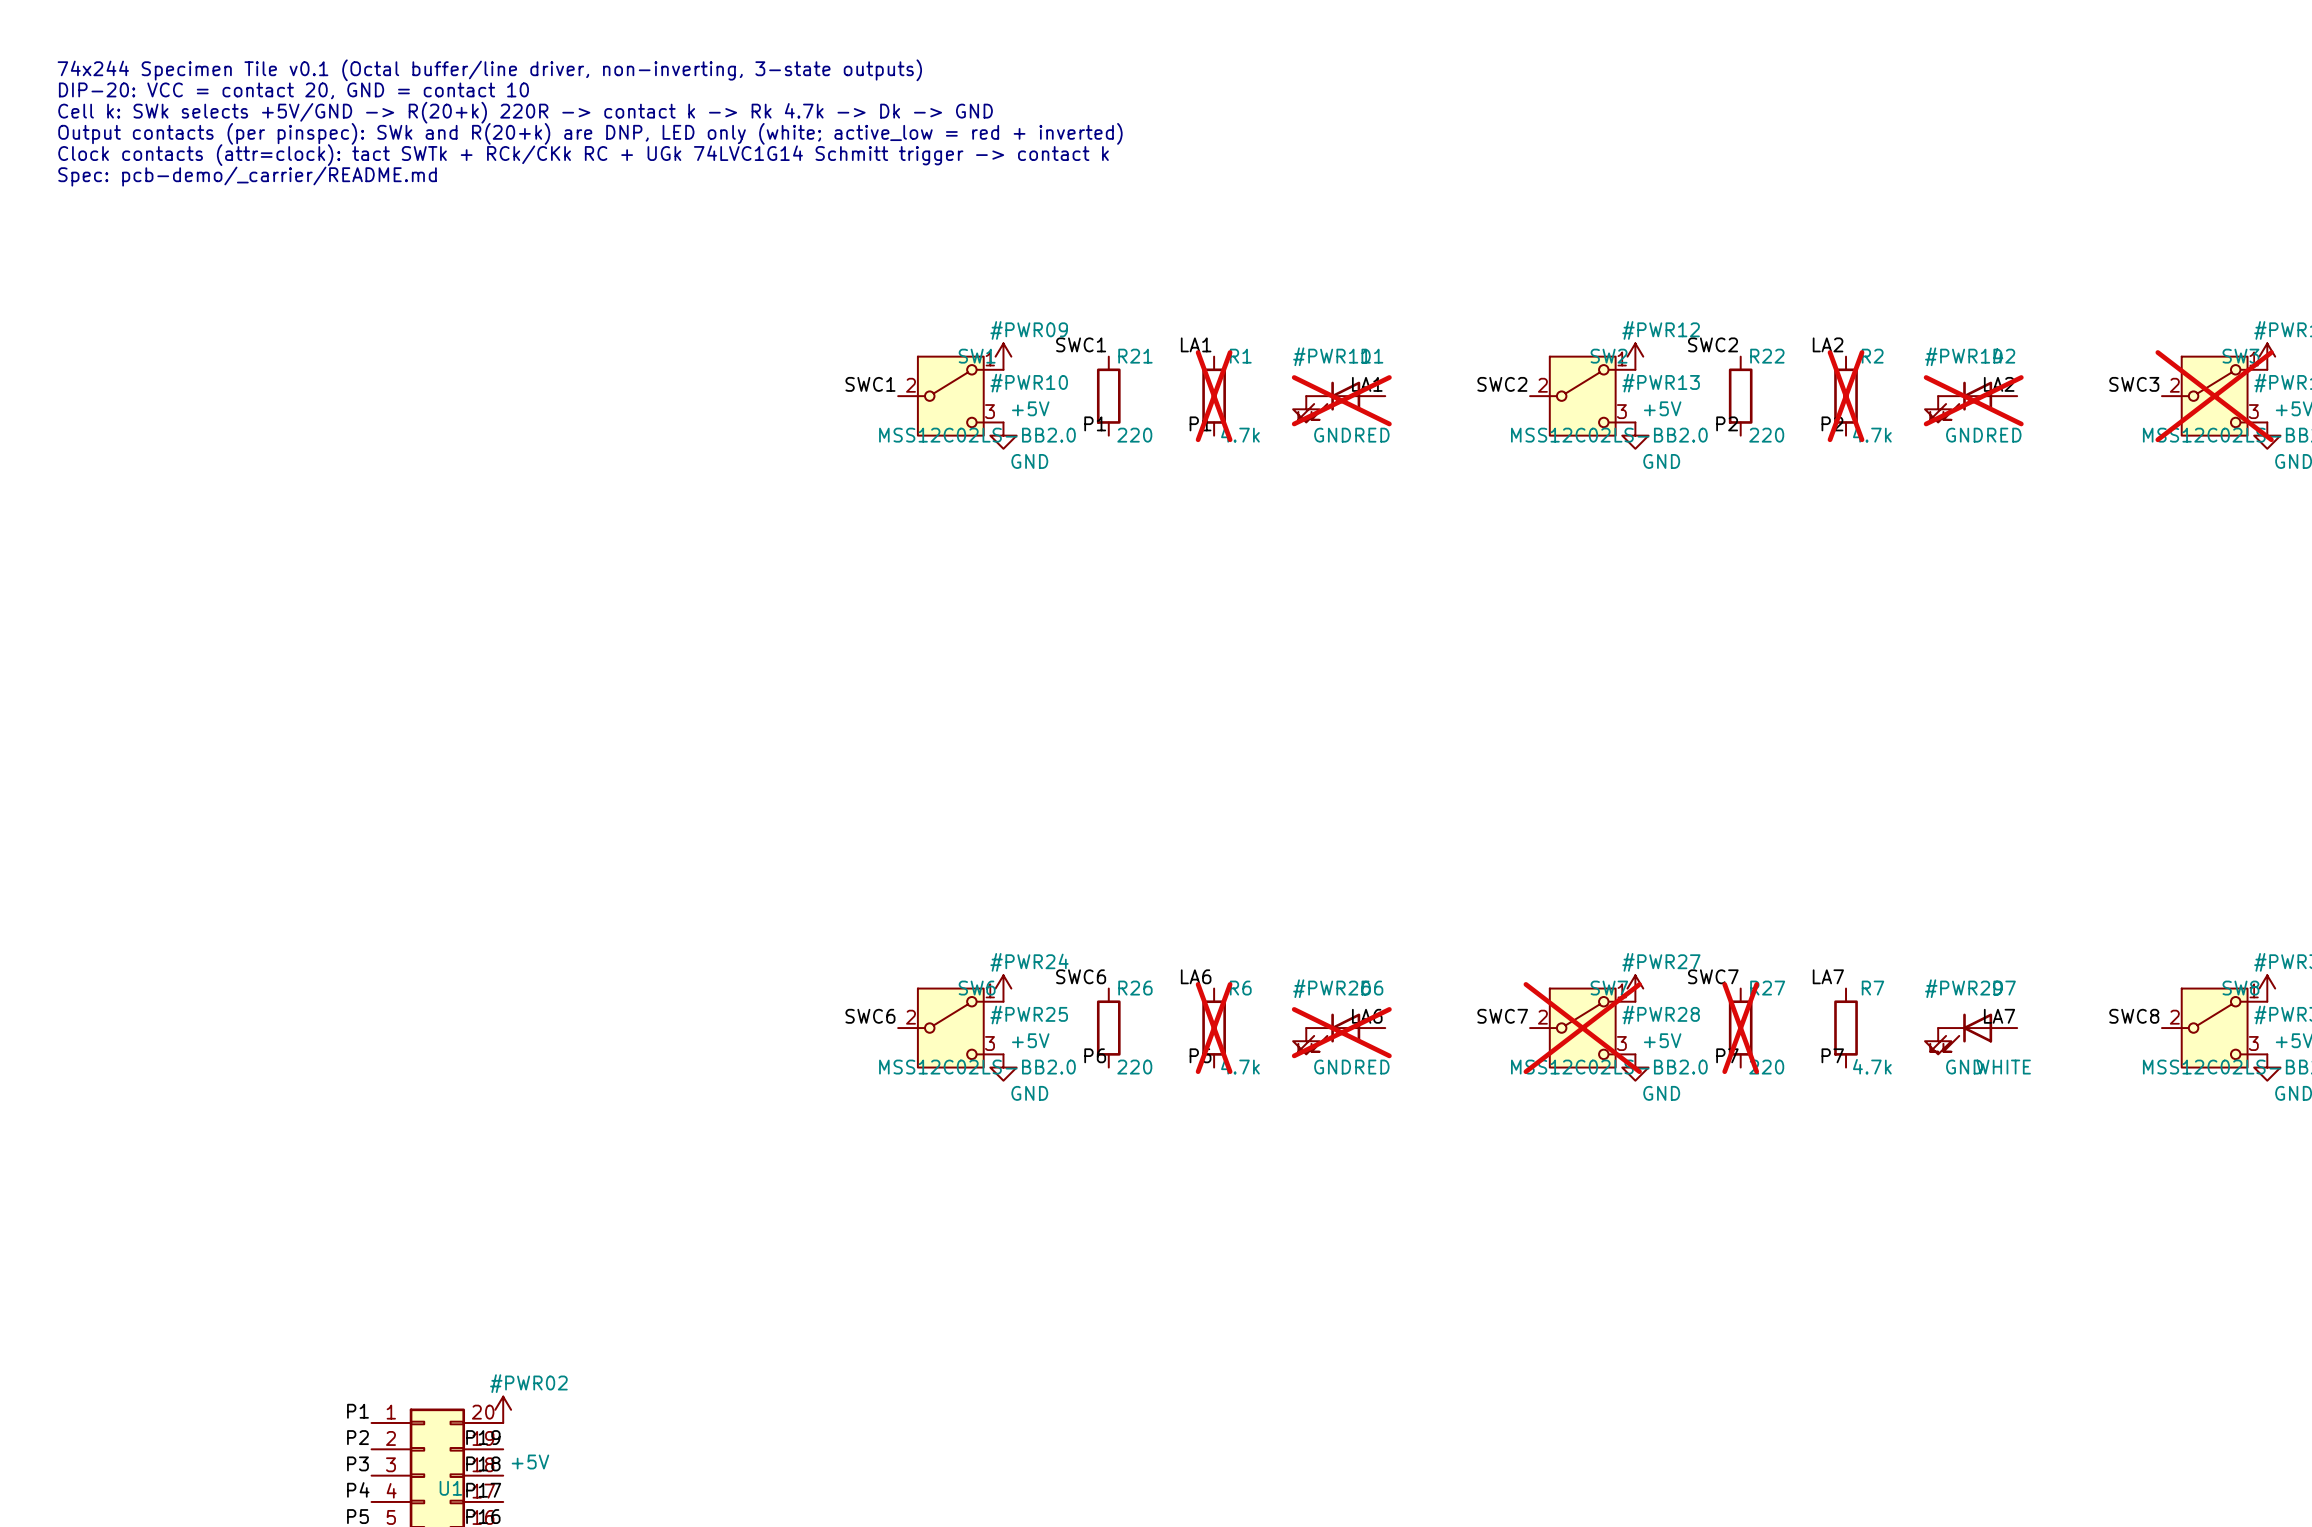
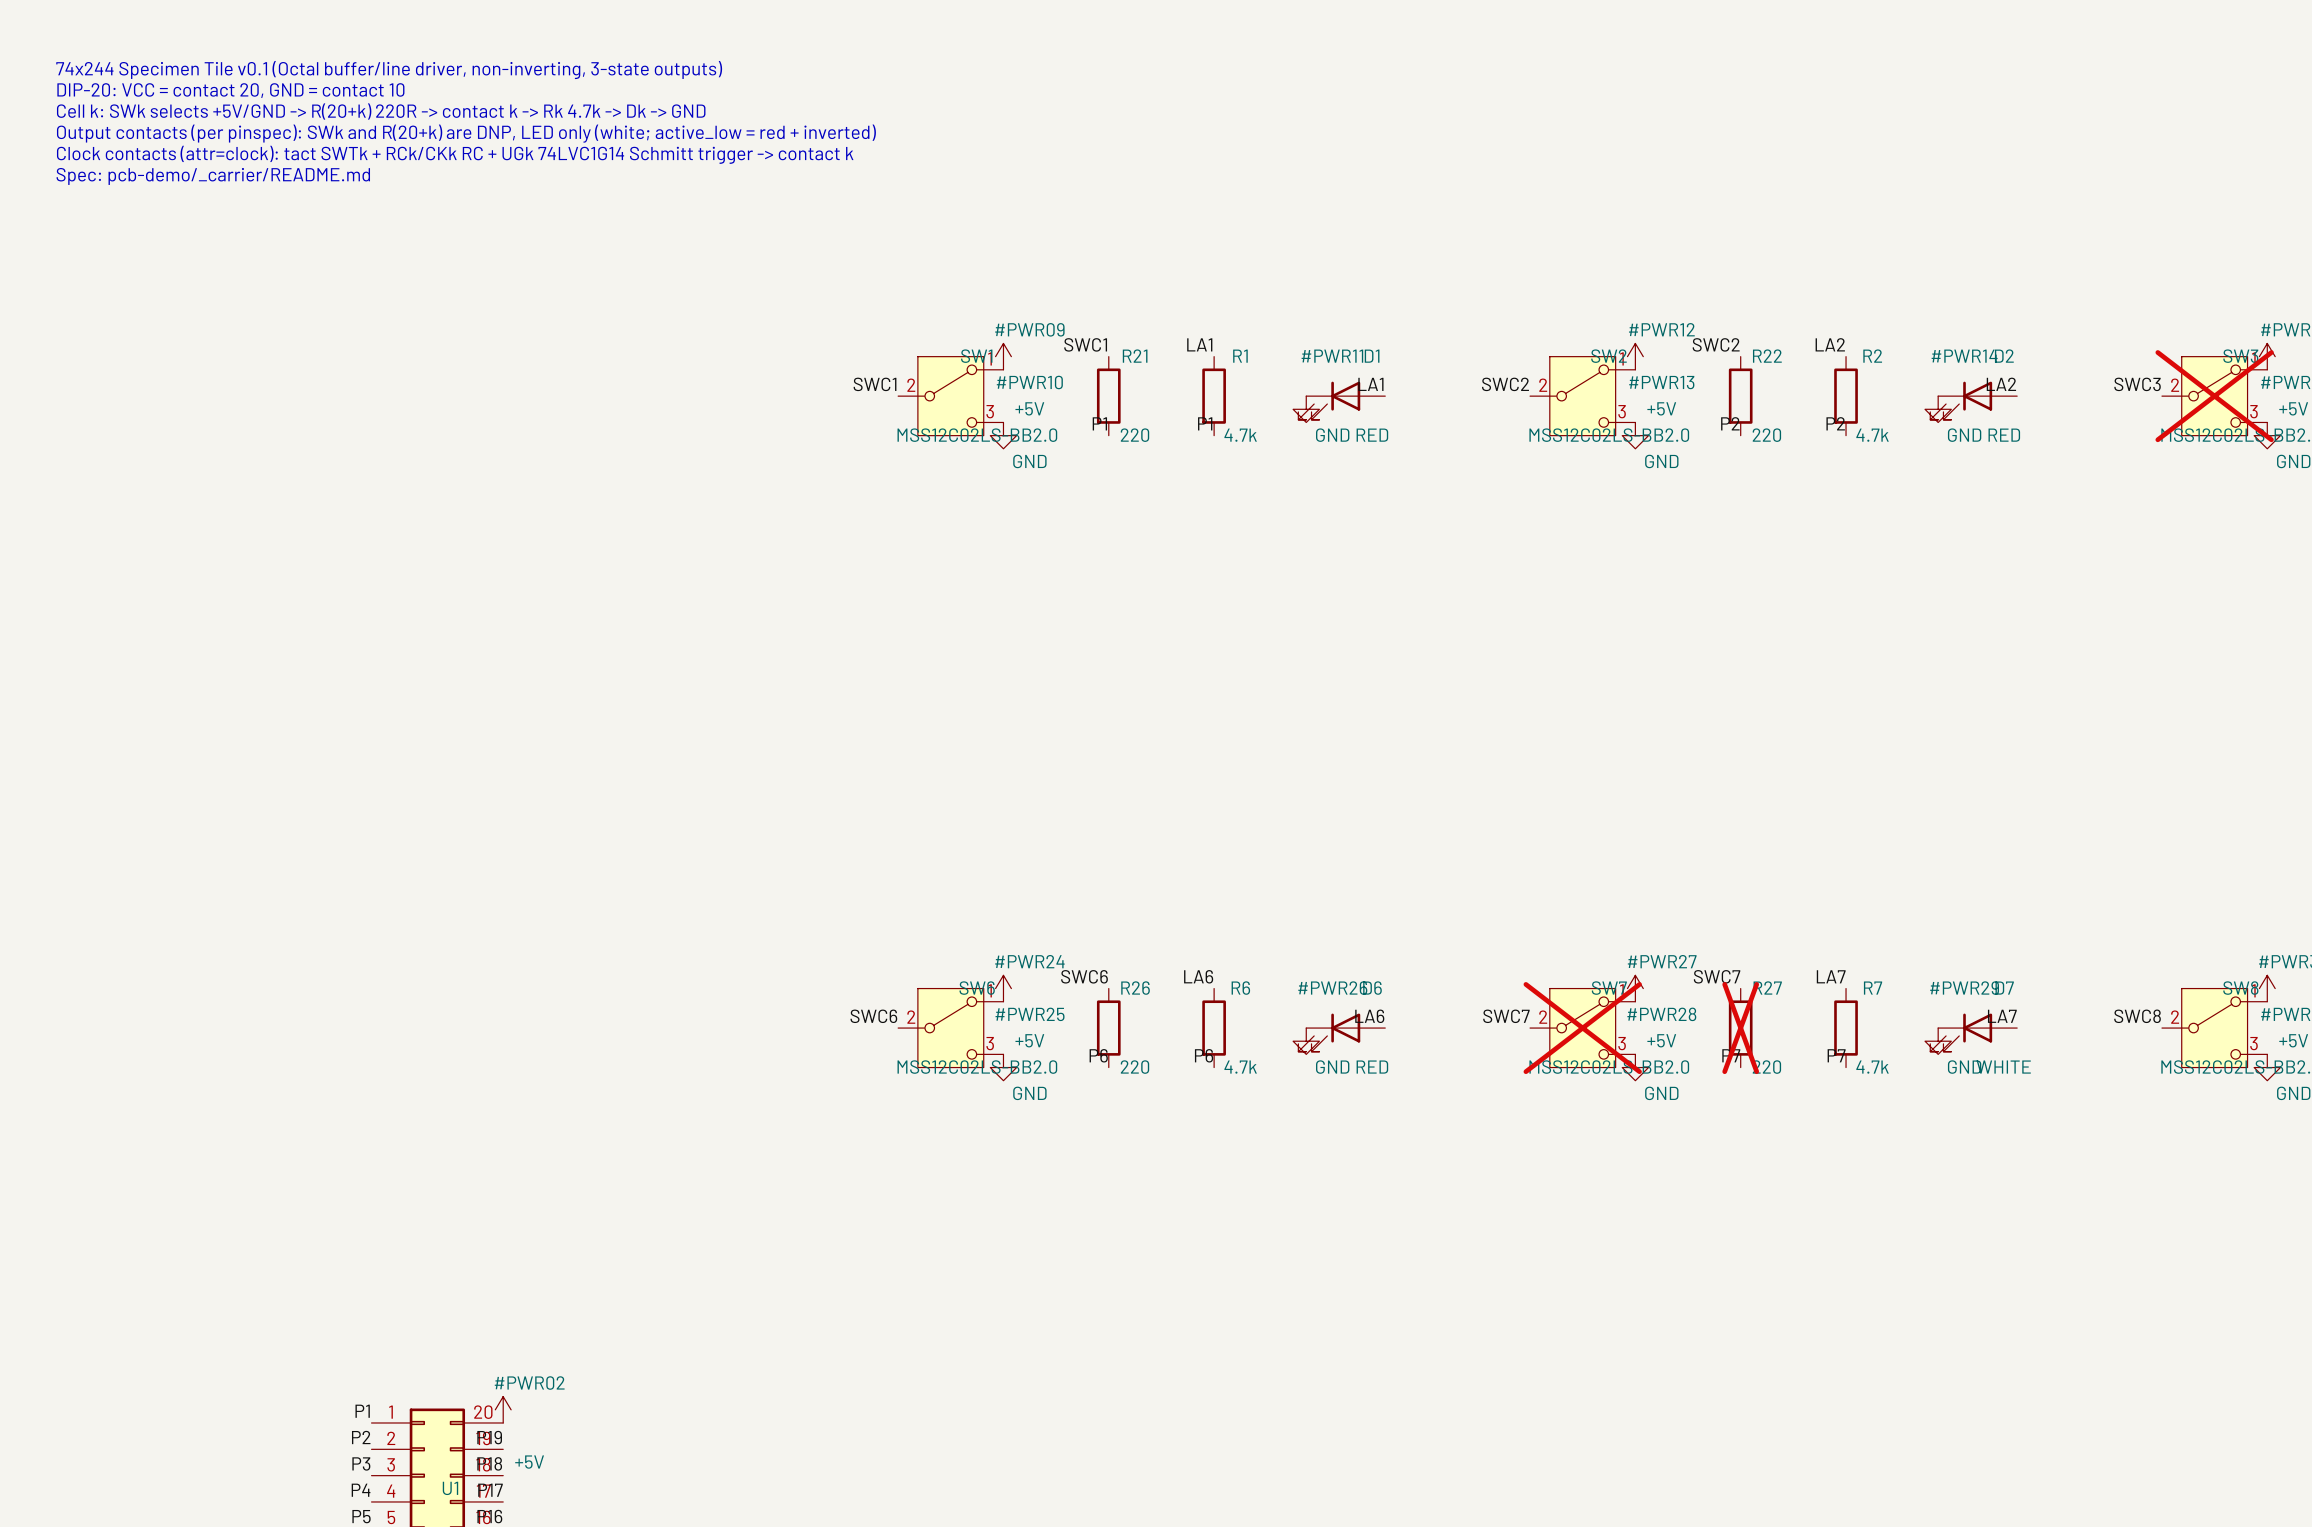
R1 do-not-place cross: (1214, 396) -> none
R2 do-not-place cross: (1846, 396) -> none
D1 do-not-place cross: (1341, 400) -> none
D2 do-not-place cross: (1973, 400) -> none
R6 do-not-place cross: (1214, 1028) -> none
D6 do-not-place cross: (1341, 1032) -> none

